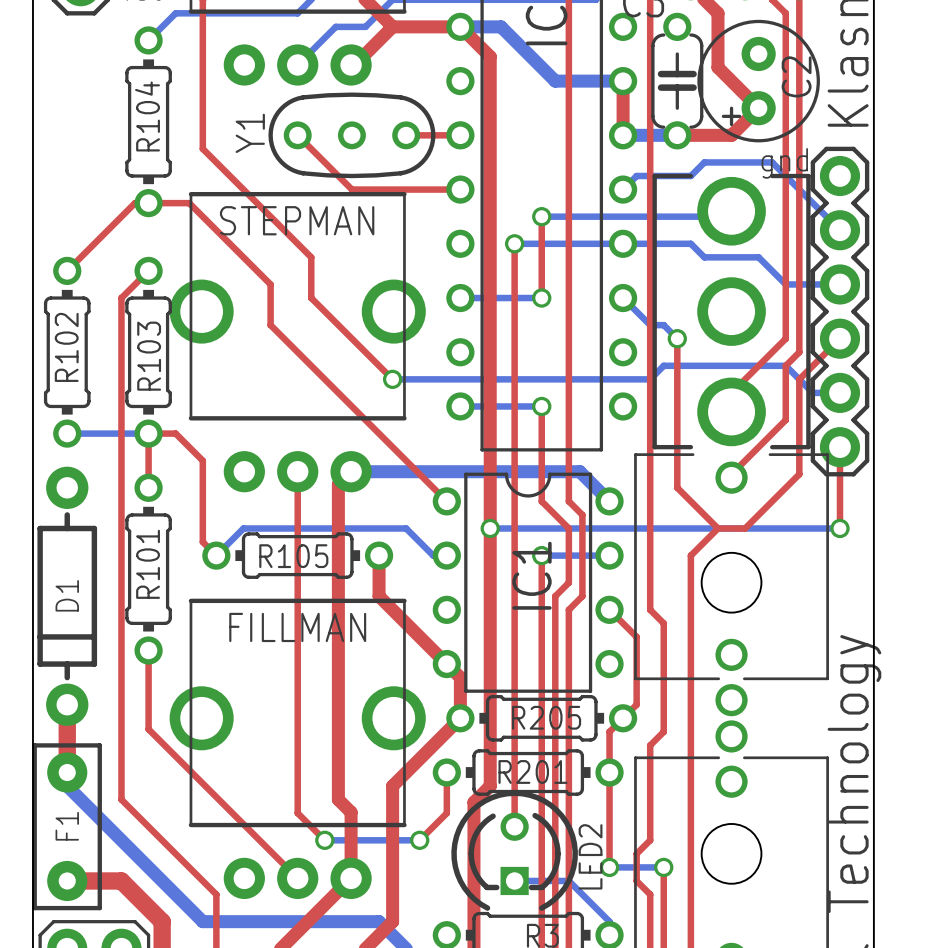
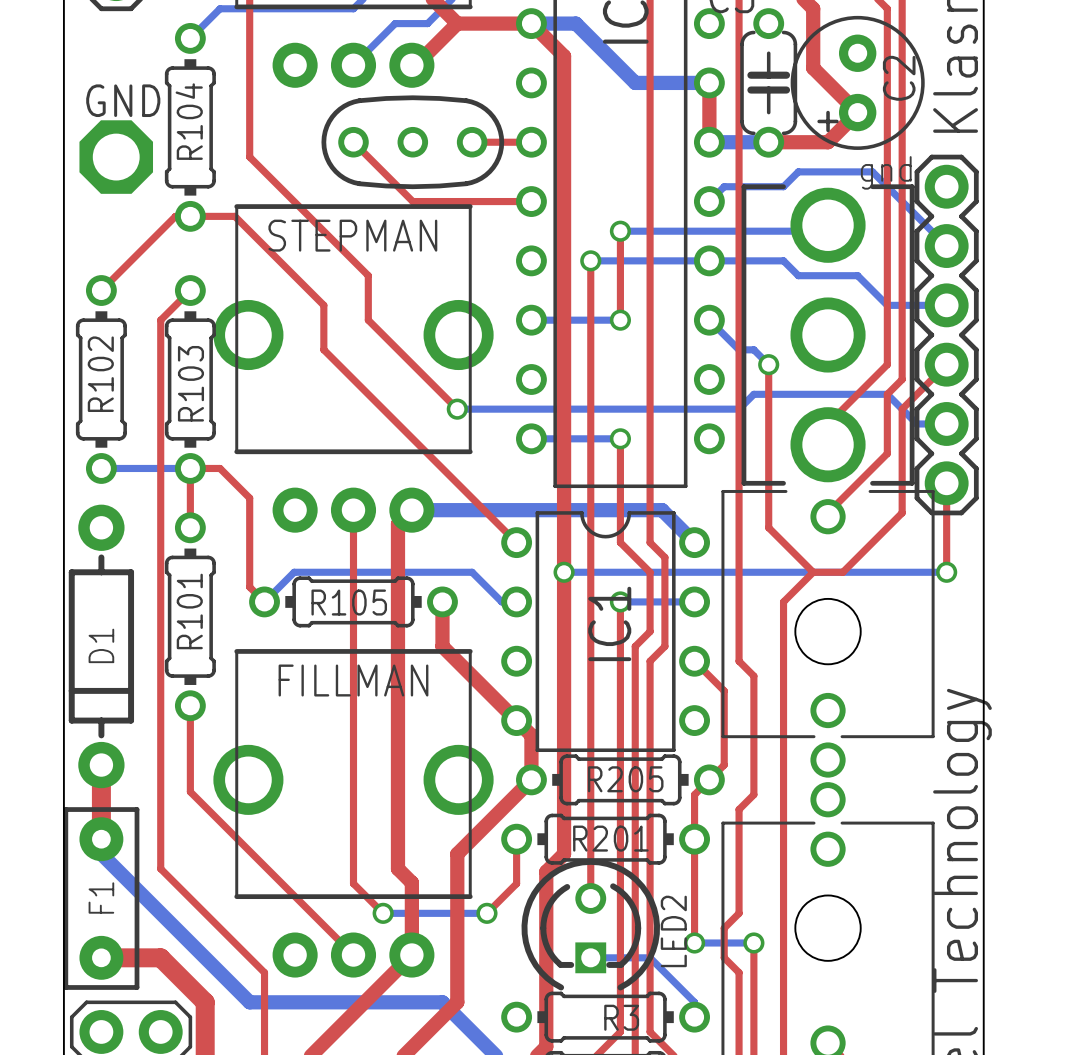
text: Y1 (250, 133) -> none
GND: none -> (116, 157)

